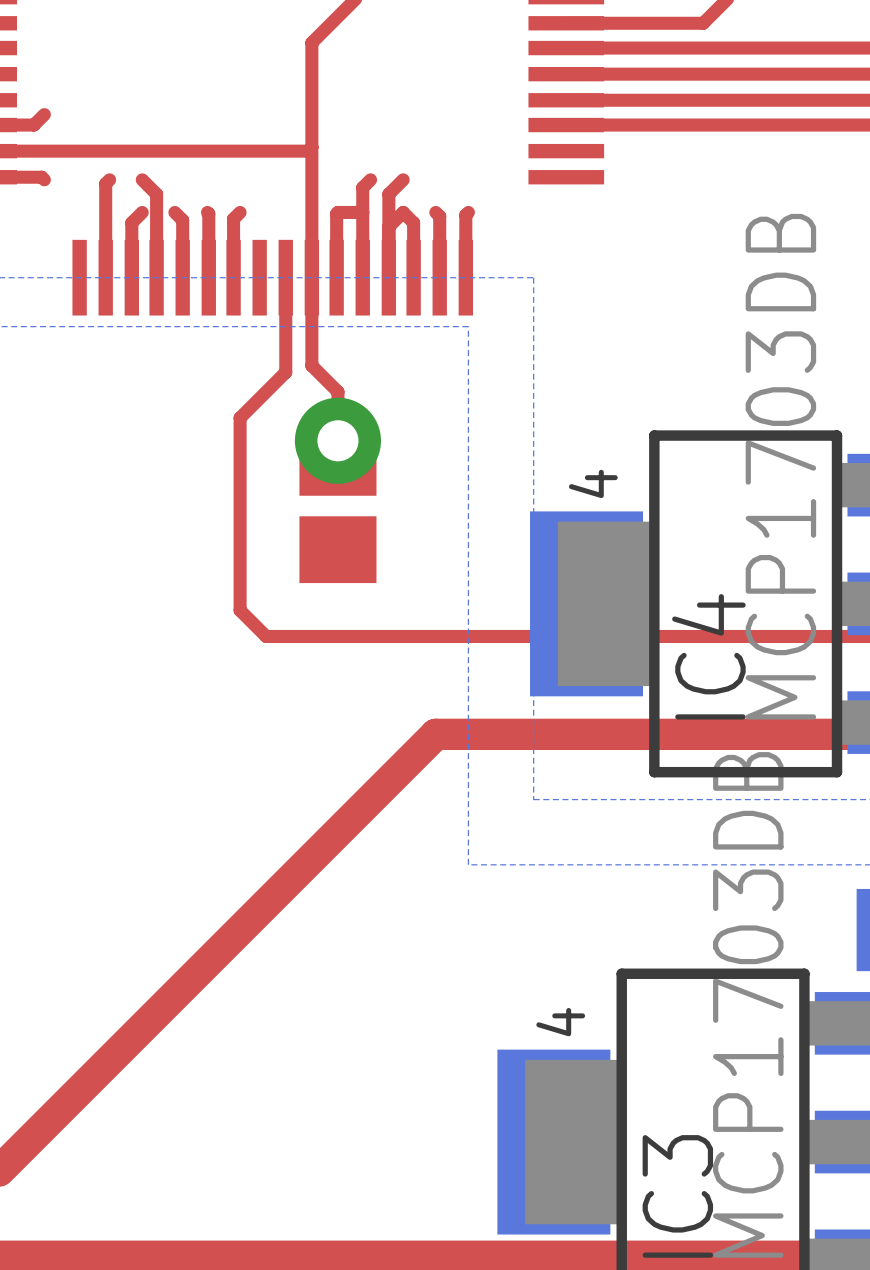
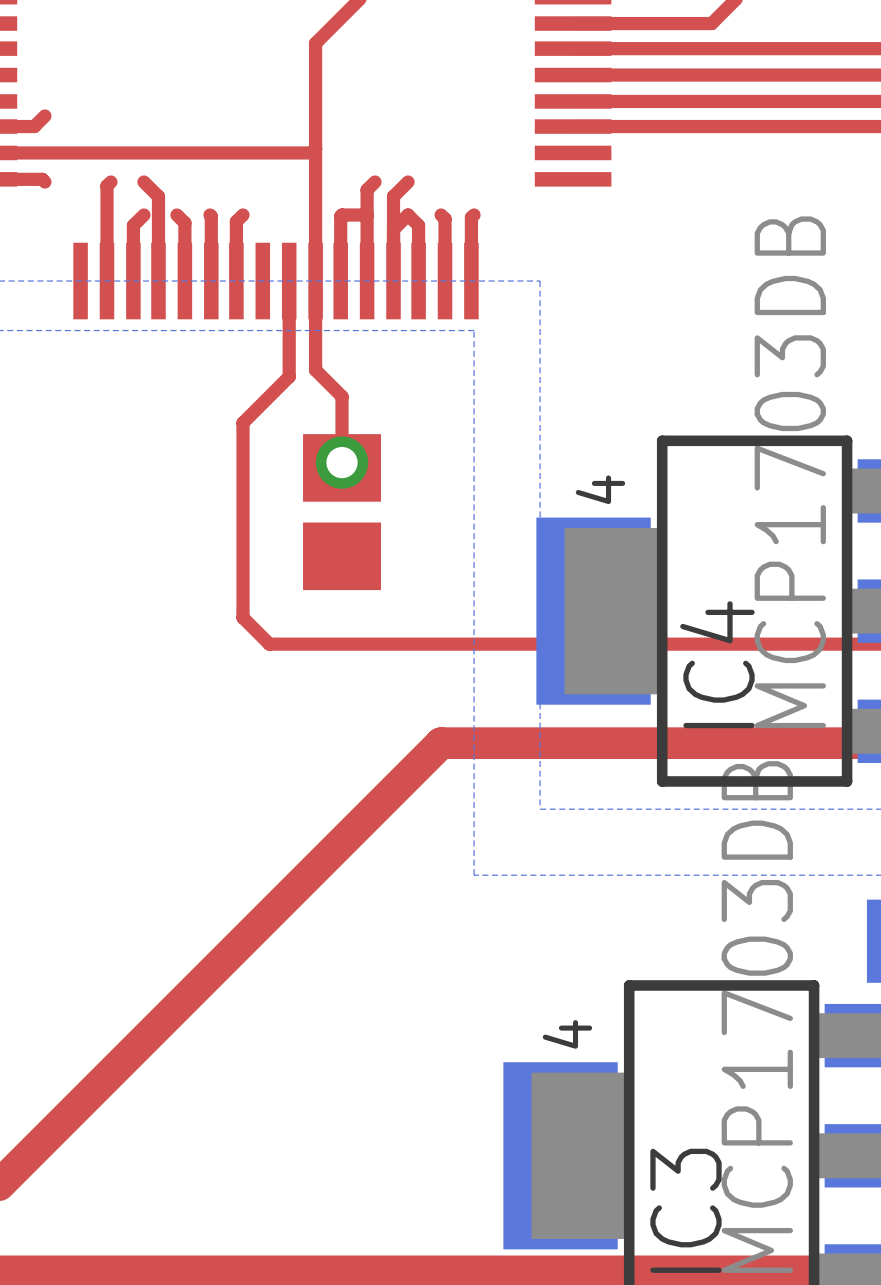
via size: [294, 397, 382, 484] -> [315, 436, 369, 489]

